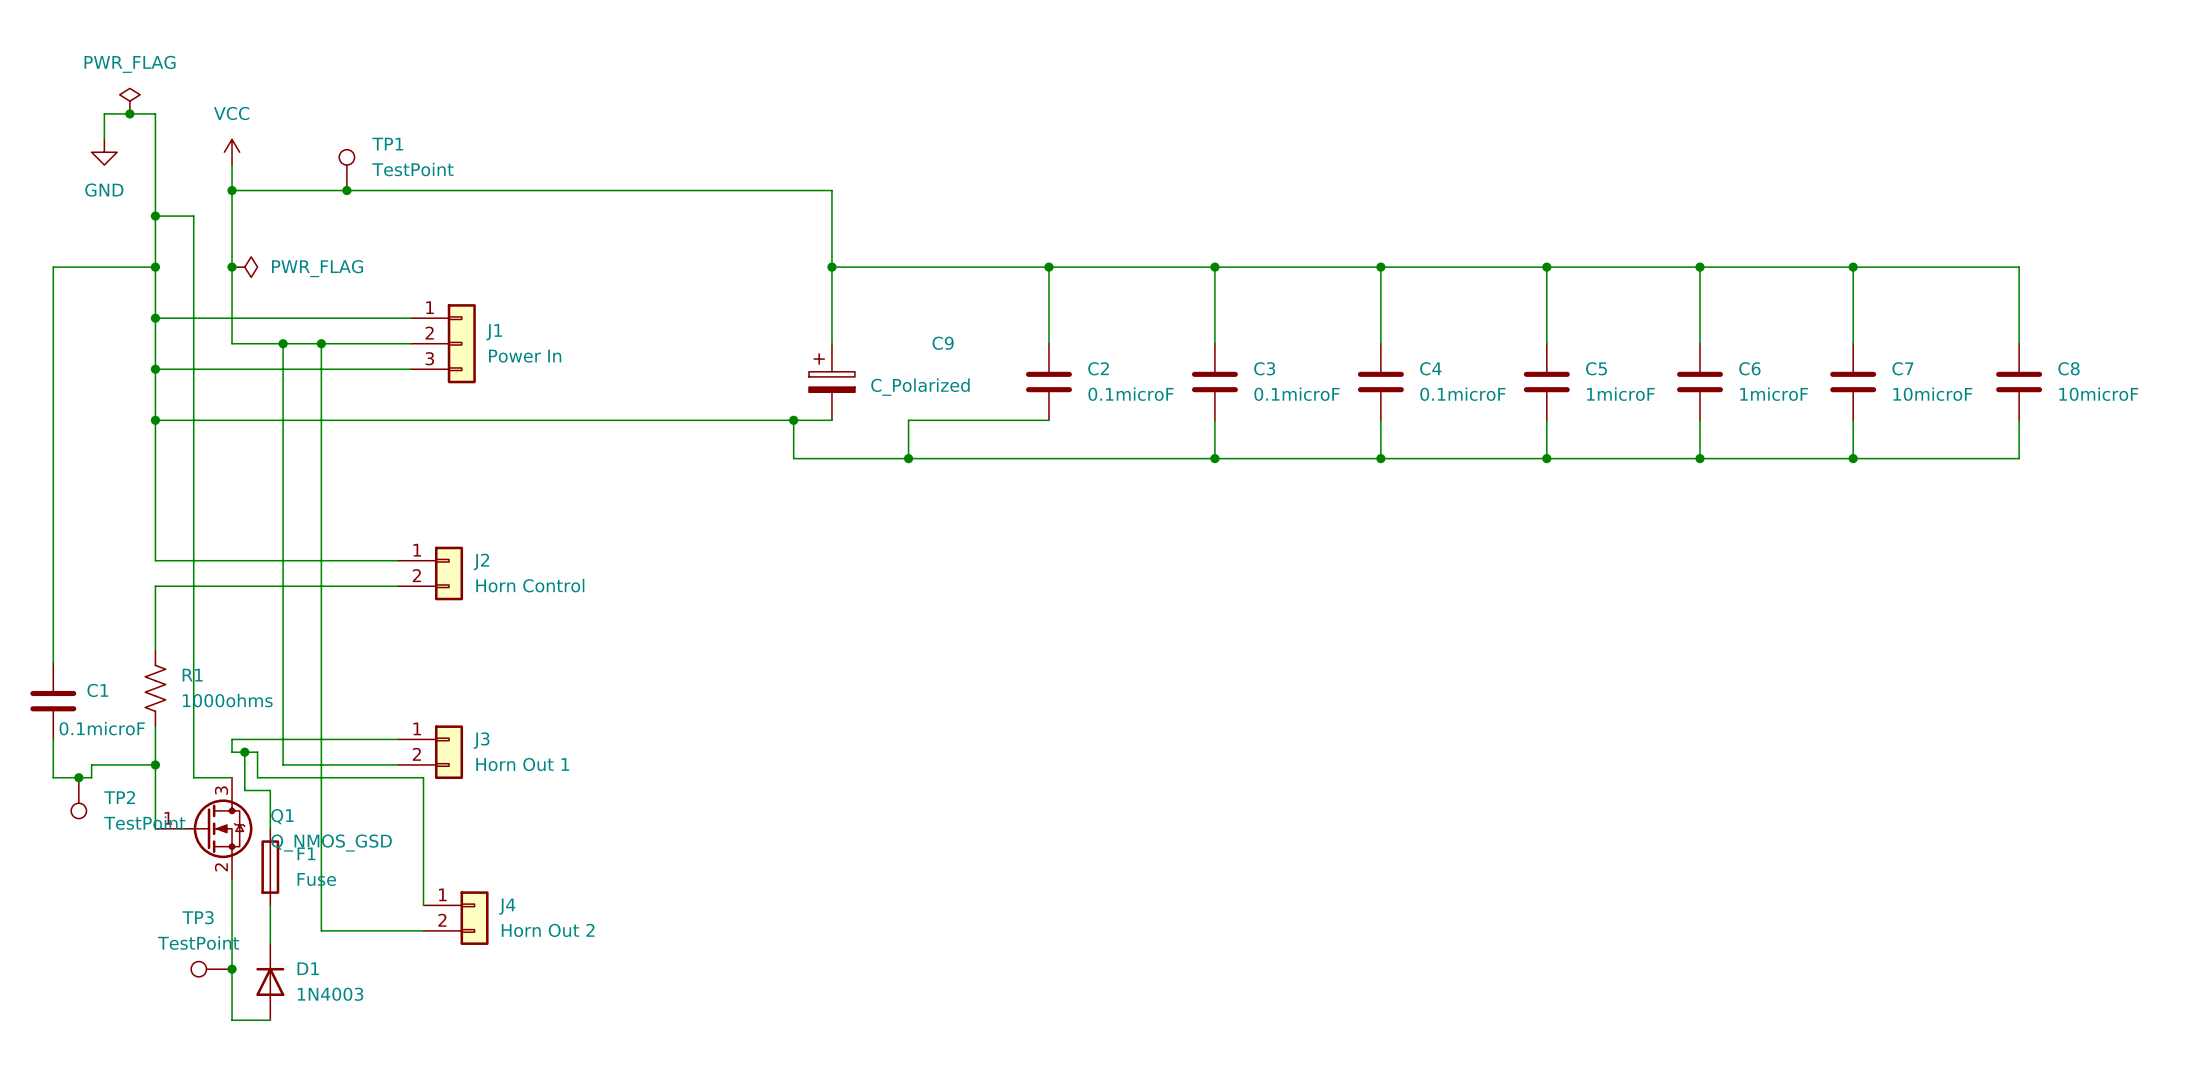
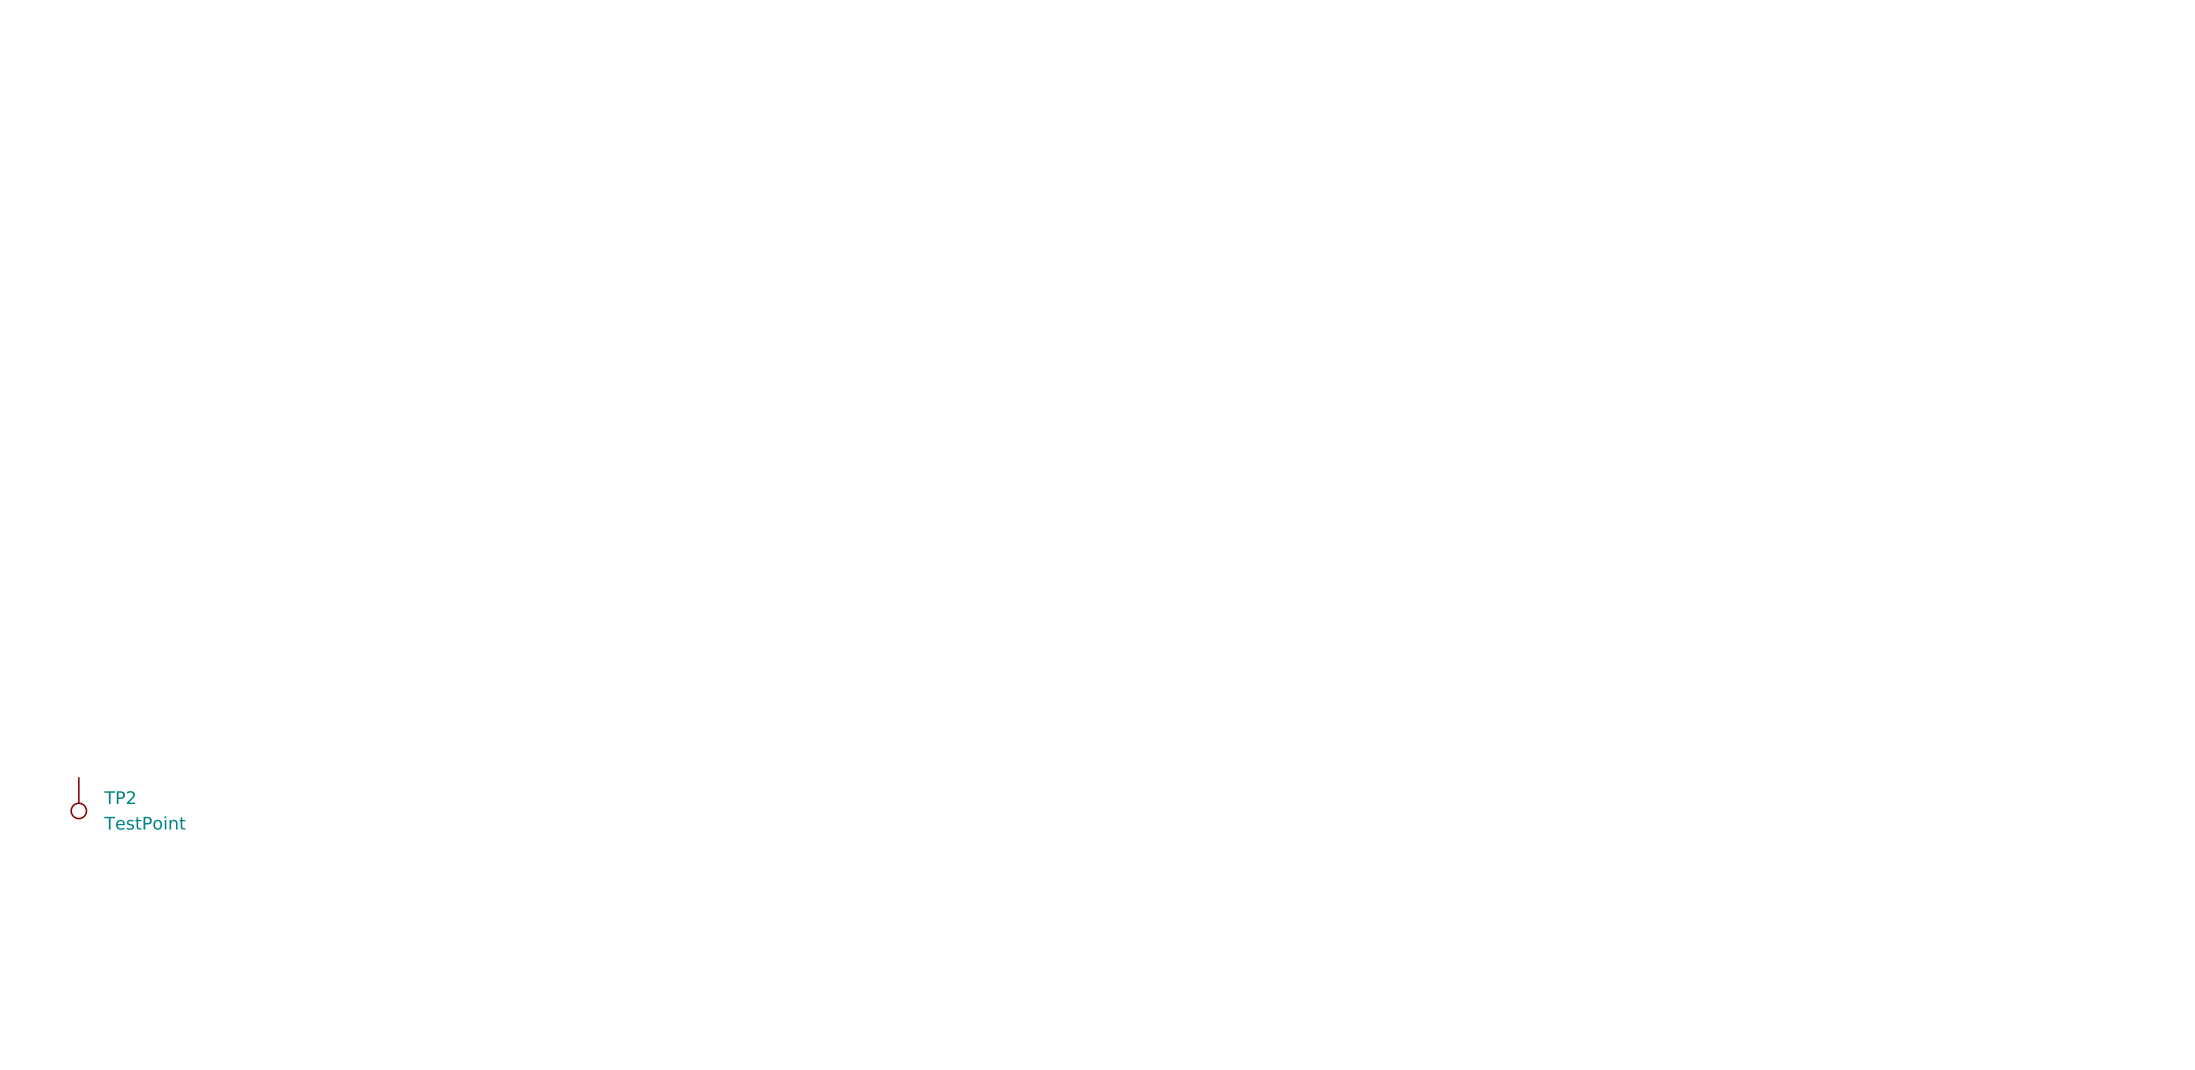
power symbol: PWR_FLAG (129, 101) -> none
junction: (129, 113) -> none
wire: (104, 139) (104, 113) (155, 113) (155, 560) (397, 560) -> none
power symbol: GND (104, 152) -> none
power symbol: VCC (232, 152) -> none
wire: (232, 165) (232, 343) (410, 343) -> none
TP1: TestPoint (346, 170) -> none
wire: (232, 190) (831, 190) (831, 343) -> none
junction: (232, 190) -> none
junction: (346, 190) -> none
wire: (155, 216) (193, 216) (193, 777) (232, 777) -> none
junction: (155, 216) -> none
wire: (155, 267) (53, 267) (53, 662) -> none
junction: (155, 267) -> none
junction: (232, 267) -> none
power symbol: PWR_FLAG (244, 267) -> none
wire: (831, 267) (2019, 267) (2019, 343) -> none
junction: (831, 267) -> none
wire: (1048, 267) (1048, 343) -> none
junction: (1048, 267) -> none
wire: (1214, 267) (1214, 343) -> none
junction: (1214, 267) -> none
wire: (1380, 267) (1380, 343) -> none
junction: (1380, 267) -> none
wire: (1546, 267) (1546, 343) -> none
junction: (1546, 267) -> none
wire: (1700, 267) (1700, 343) -> none
junction: (1700, 267) -> none
wire: (1853, 267) (1853, 343) -> none
junction: (1853, 267) -> none
wire: (155, 318) (410, 318) -> none
junction: (155, 318) -> none
wire: (283, 343) (283, 764) (397, 764) -> none
junction: (283, 343) -> none
wire: (321, 343) (321, 930) (423, 930) -> none
junction: (321, 343) -> none
J1: Power In (443, 343) -> none
wire: (155, 369) (410, 369) -> none
junction: (155, 369) -> none
C9: C_Polarized (831, 382) -> none
C2: 0.1microF (1048, 382) -> none
C3: 0.1microF (1214, 382) -> none
C4: 0.1microF (1380, 382) -> none
C5: 1microF (1546, 382) -> none
C6: 1microF (1700, 382) -> none
C7: 10microF (1853, 382) -> none
C8: 10microF (2019, 382) -> none
wire: (155, 420) (831, 420) -> none
junction: (155, 420) -> none
wire: (793, 420) (793, 458) (2019, 458) (2019, 420) -> none
junction: (793, 420) -> none
wire: (1048, 420) (908, 420) (908, 458) -> none
wire: (1214, 420) (1214, 458) -> none
wire: (1380, 420) (1380, 458) -> none
wire: (1546, 420) (1546, 458) -> none
wire: (1700, 420) (1700, 458) -> none
wire: (1853, 420) (1853, 458) -> none
junction: (908, 458) -> none
junction: (1214, 458) -> none
junction: (1380, 458) -> none
junction: (1546, 458) -> none
junction: (1700, 458) -> none
junction: (1853, 458) -> none
J2: Horn Control (430, 573) -> none
wire: (397, 586) (155, 586) (155, 650) -> none
R1: 1000ohms (155, 688) -> none
C1: 0.1microF (53, 701) -> none
wire: (155, 726) (155, 828) -> none
wire: (53, 739) (53, 777) (91, 777) (91, 764) (155, 764) -> none
wire: (397, 739) (232, 739) (232, 752) (257, 752) (257, 777) (423, 777) (423, 905) -> none
wire: (244, 752) (244, 790) (270, 790) (270, 828) -> none
junction: (244, 752) -> none
J3: Horn Out 1 (430, 752) -> none
junction: (155, 764) -> none
junction: (78, 777) -> none
Q1: Q_NMOS_GSD (203, 828) -> none
F1: Fuse (270, 867) -> none
wire: (232, 879) (232, 1020) (270, 1020) -> none
wire: (270, 905) (270, 943) -> none
J4: Horn Out 2 (456, 918) -> none
TP3: TestPoint (211, 969) -> none
junction: (232, 969) -> none
D1: 1N4003 (270, 981) -> none

